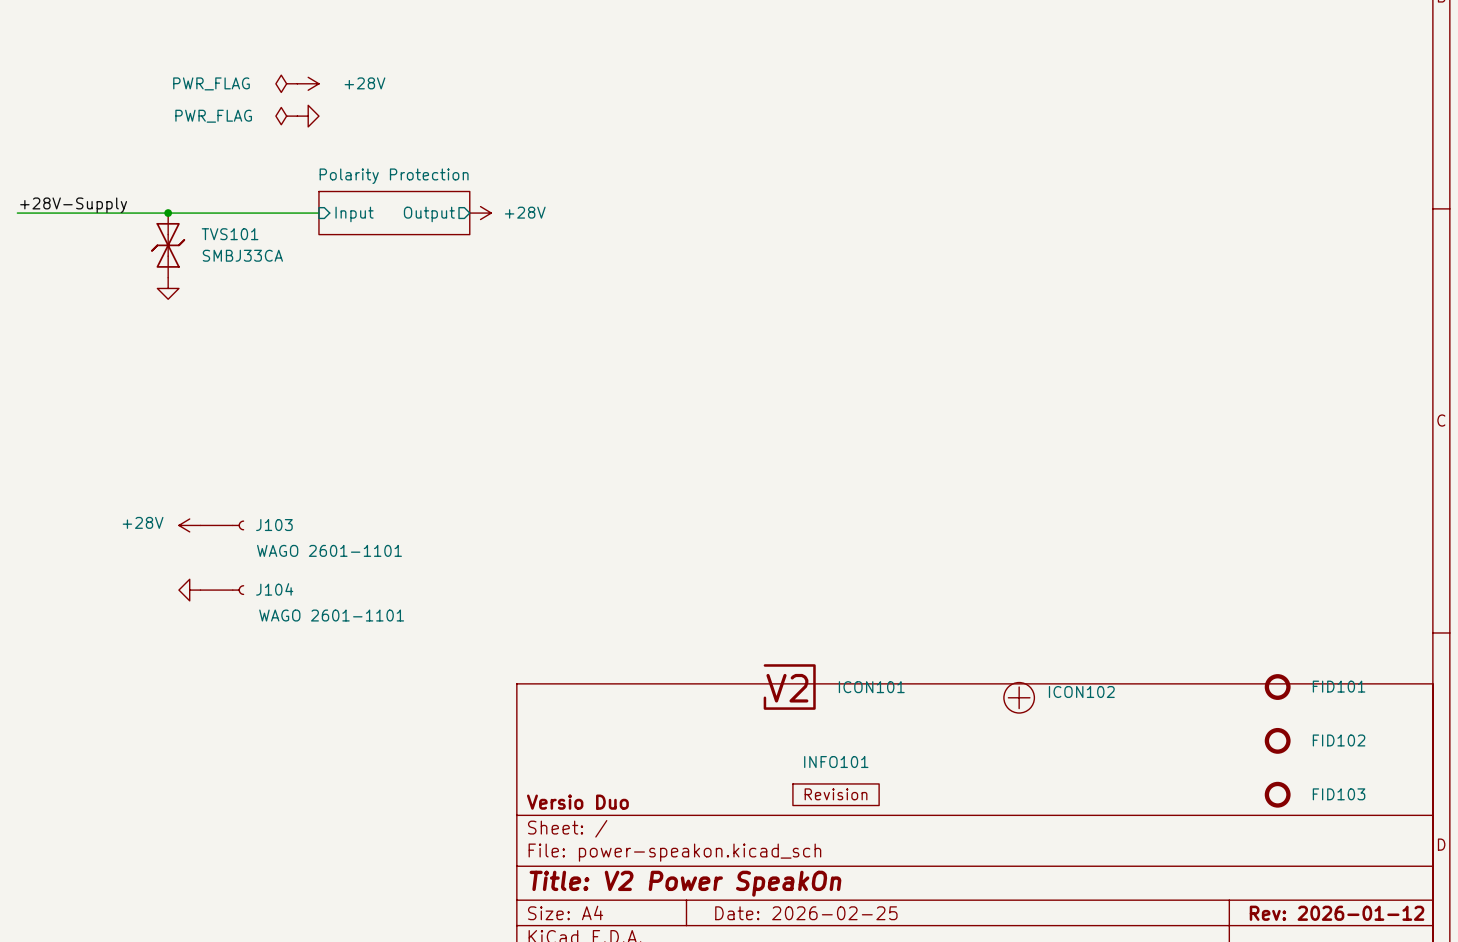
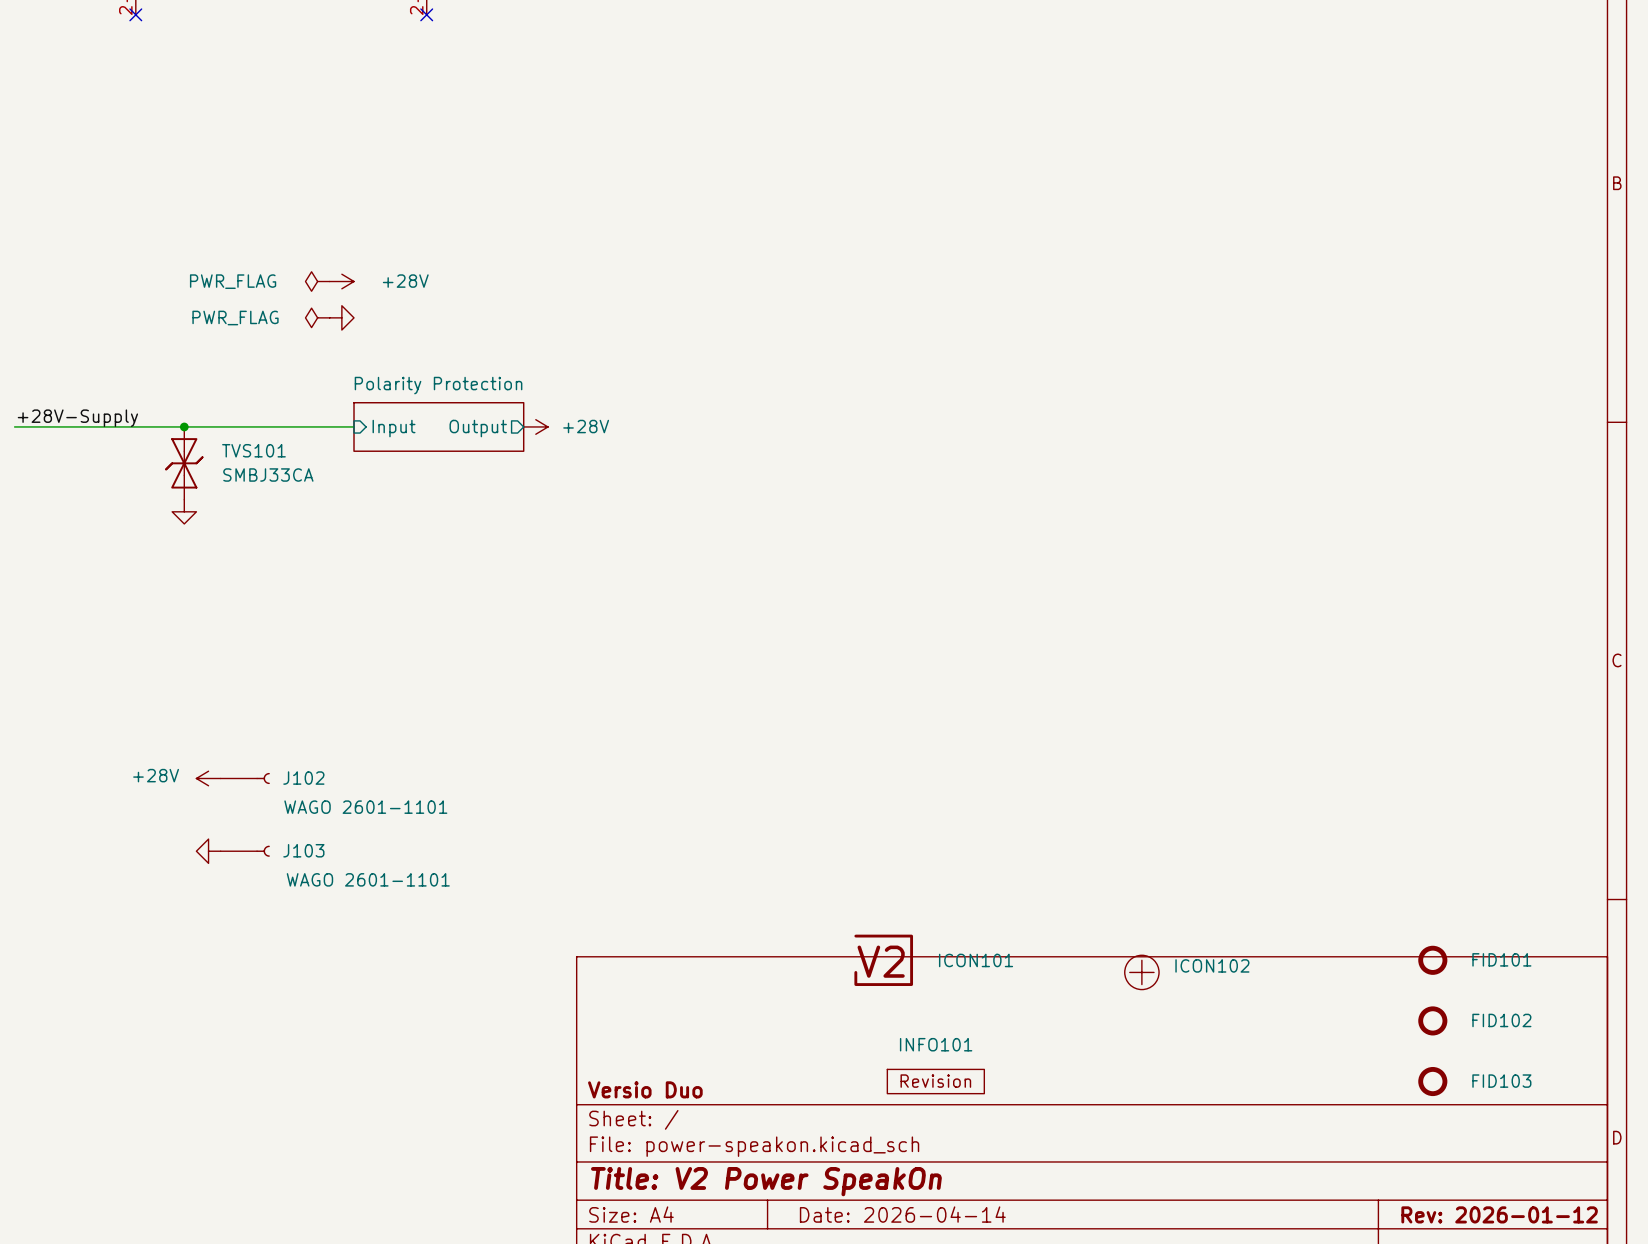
J103 name: J103 (274, 525) -> J102 (303, 778)
J104 name: J104 (274, 589) -> J103 (303, 850)
title block: Date: 2026-02-25 (806, 913) -> Date: 2026-04-14 (902, 1214)

